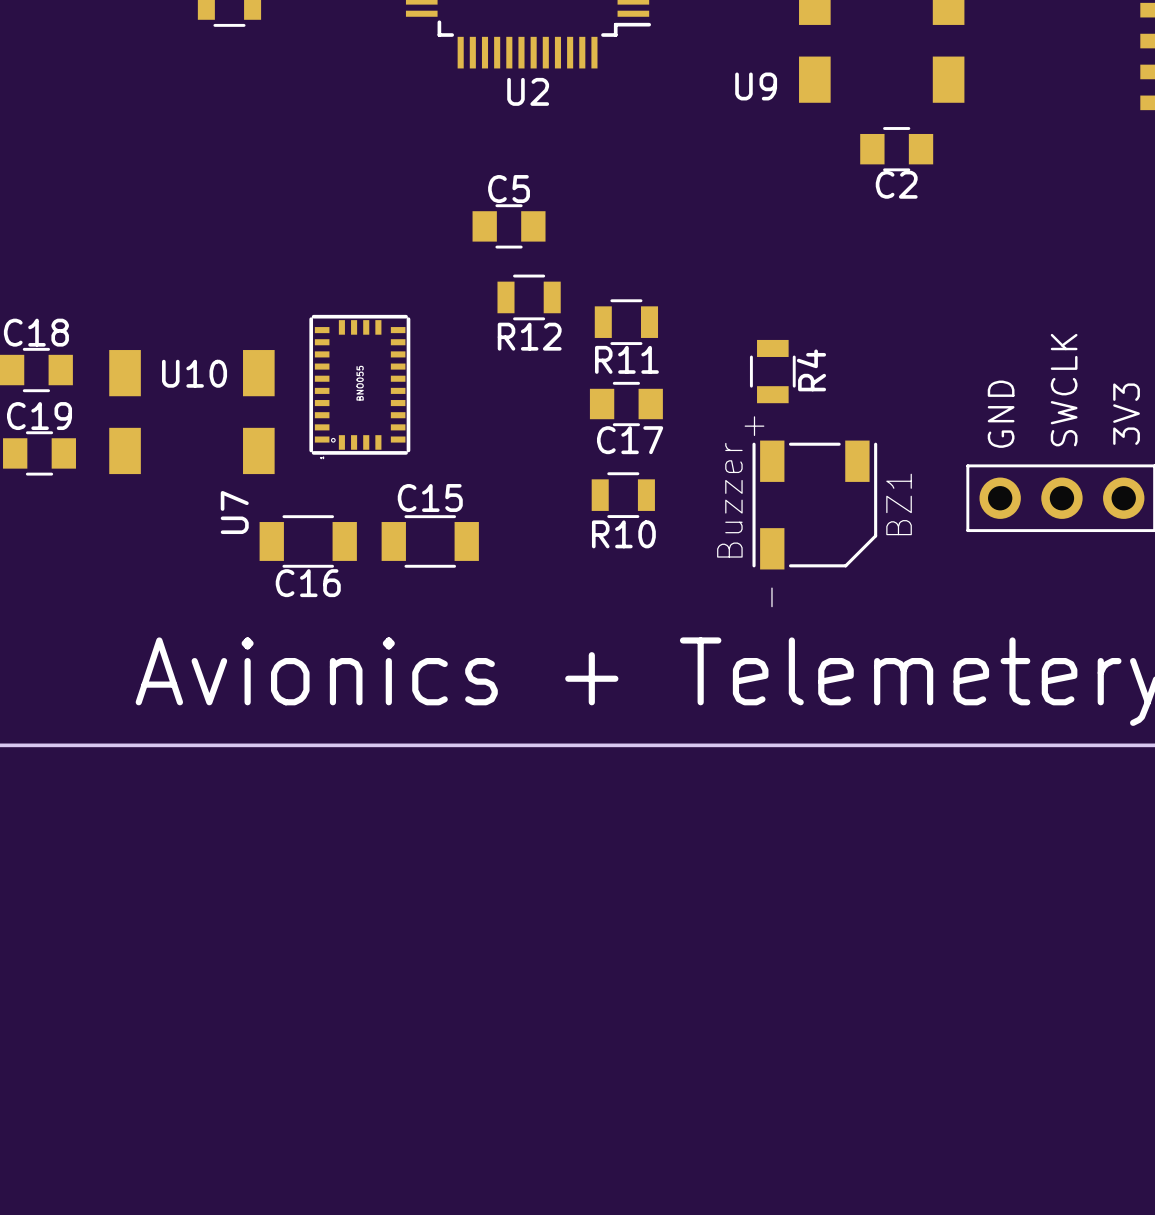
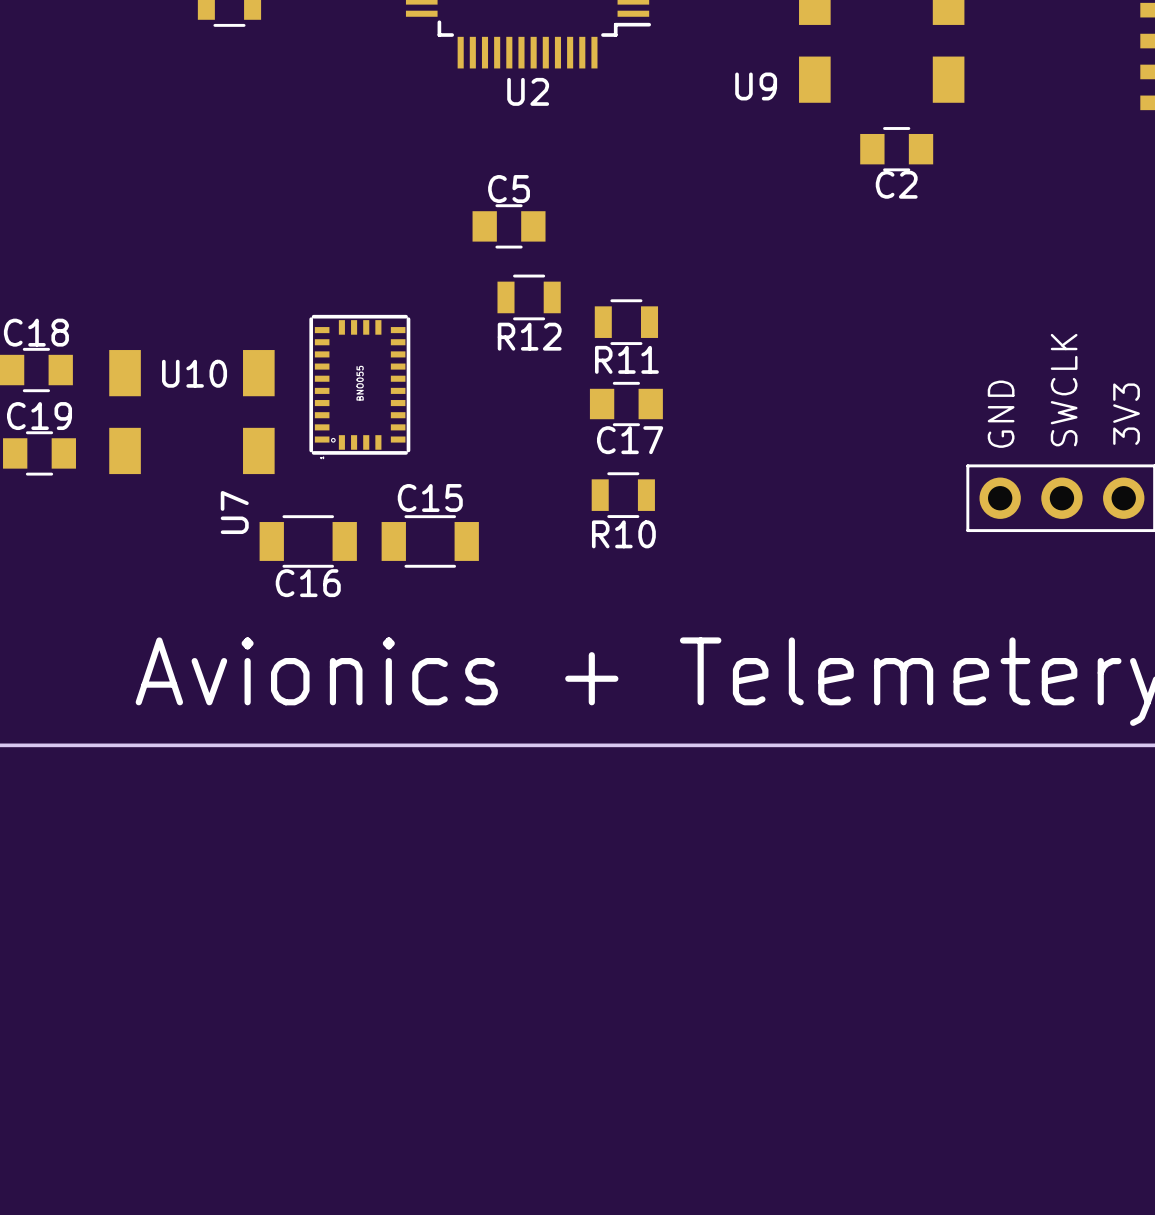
R4: (772, 371) -> none
BZ1: Buzzer (814, 505) -> none

